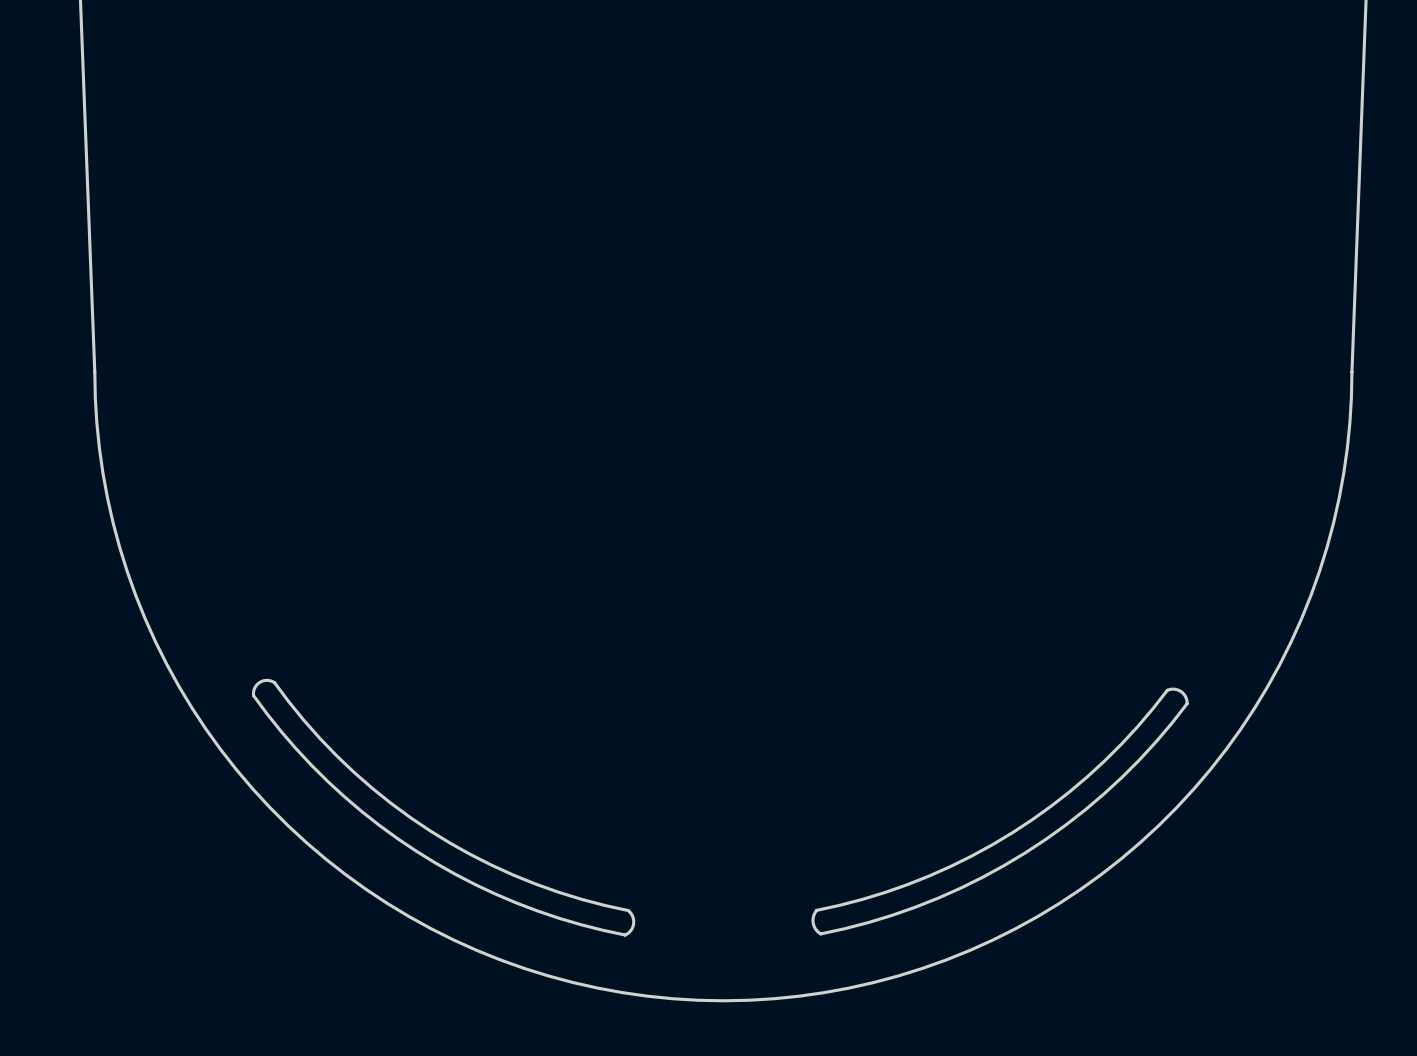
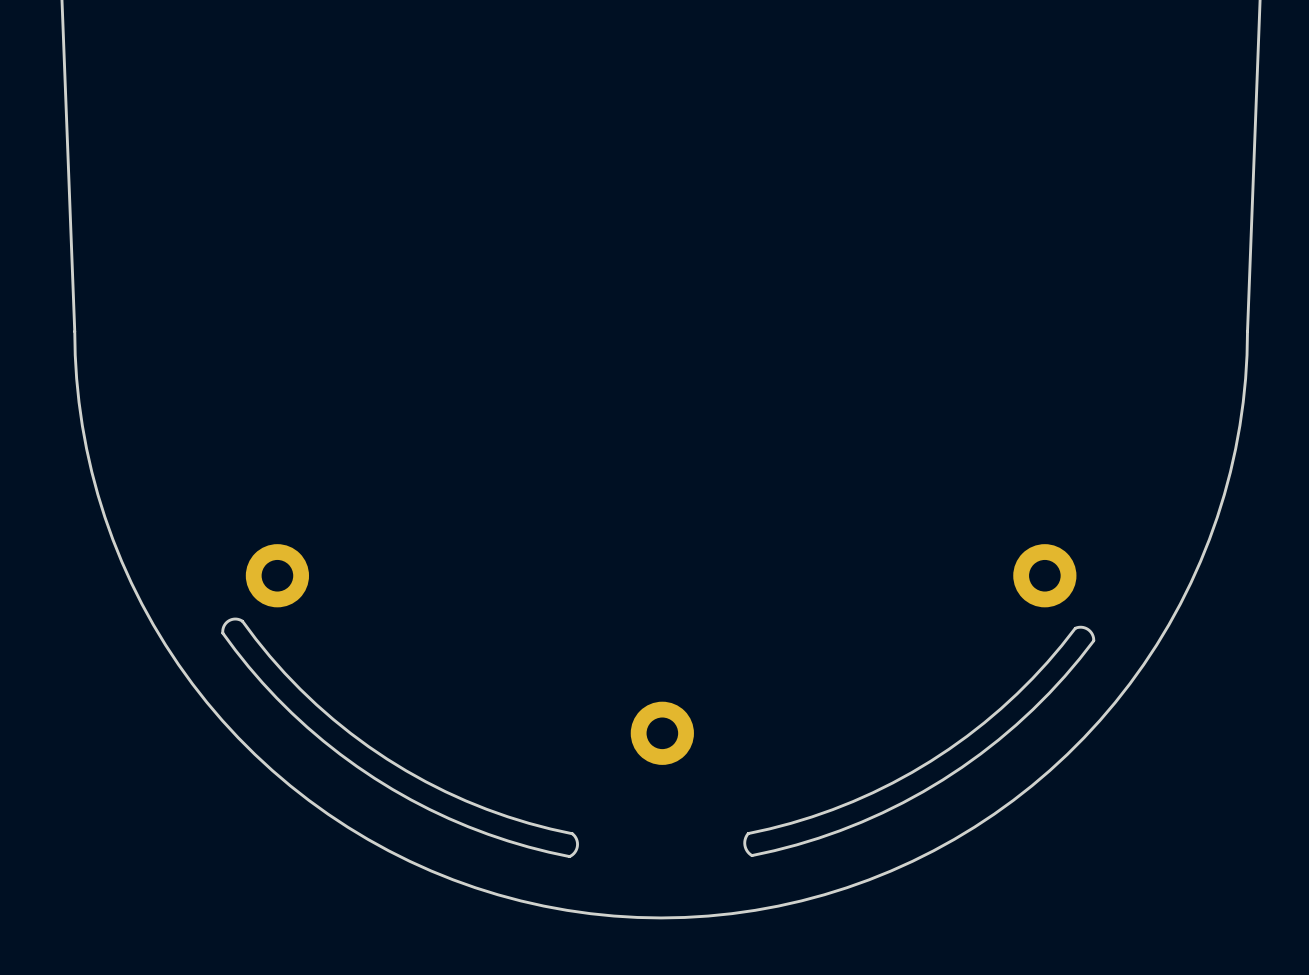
part: none -> (277, 575)
part: none -> (1044, 575)
part: none -> (662, 733)

